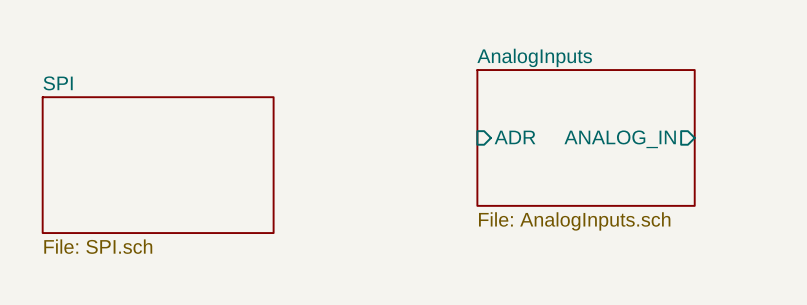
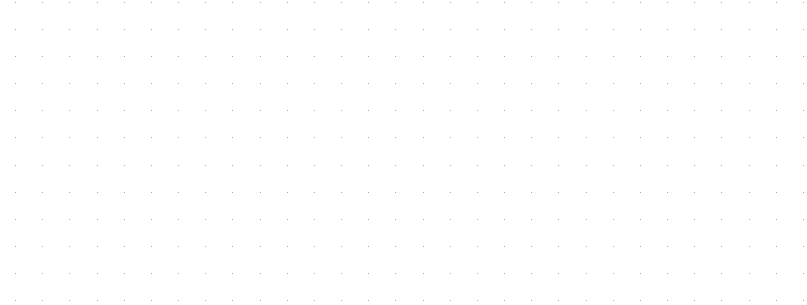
sheet pin: ADR (515, 137) -> none
sheet AnalogInputs: File: AnalogInputs.sch (586, 137) -> none
sheet pin: ANALOG_IN (620, 139) -> none
sheet SPI: File: SPI.sch (158, 165) -> none

